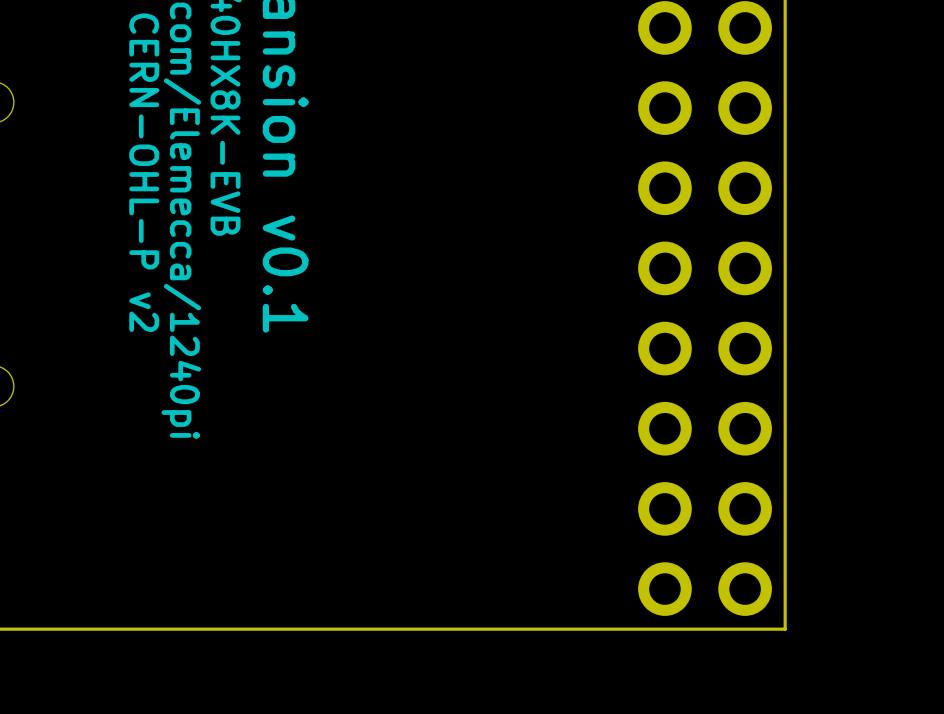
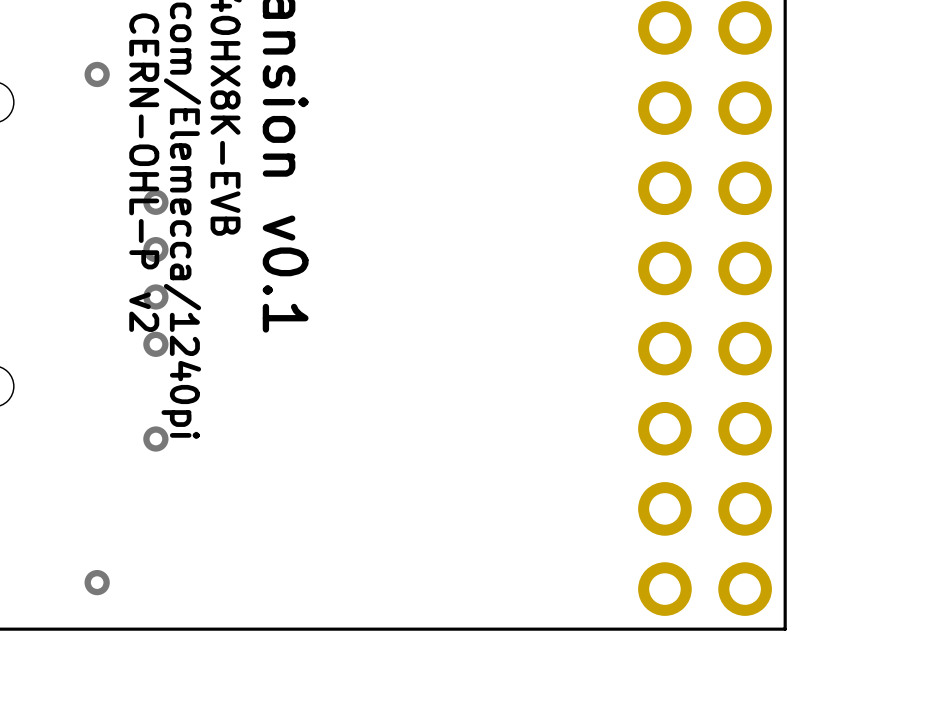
via: none -> (97, 74)
via: none -> (155, 202)
via: none -> (155, 249)
via: none -> (155, 296)
via: none -> (155, 344)
via: none -> (155, 439)
via: none -> (97, 582)

